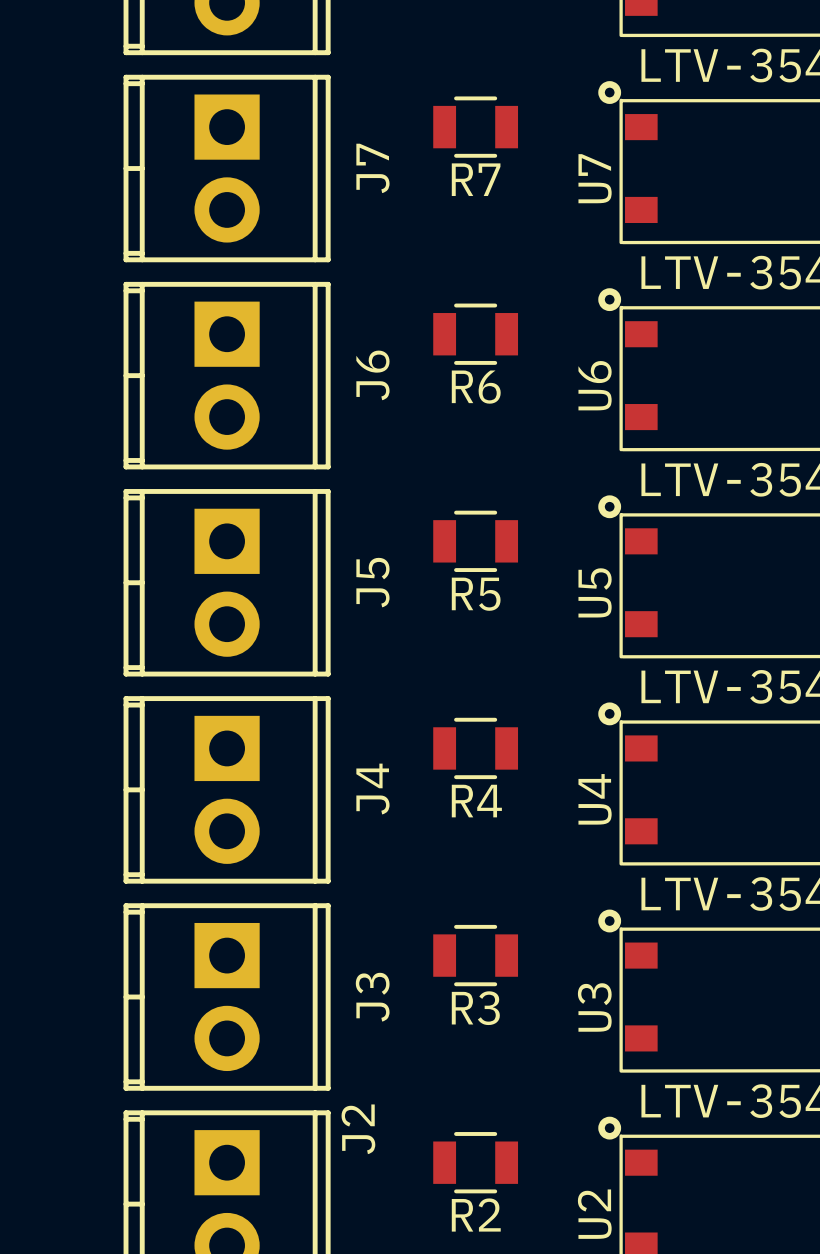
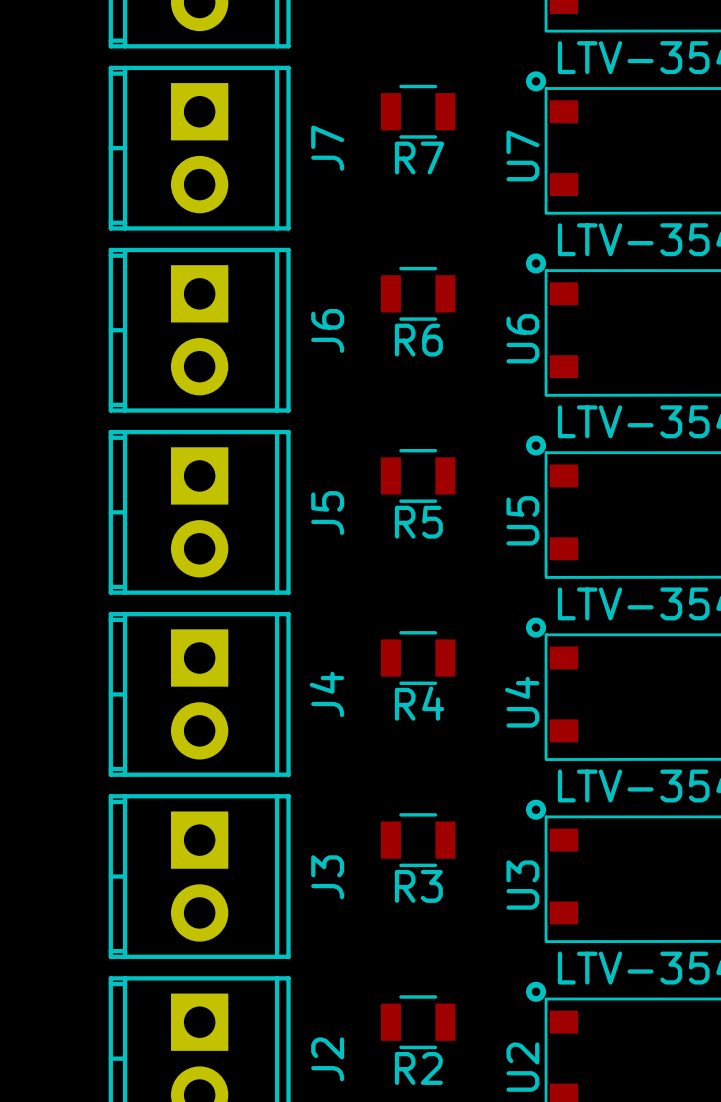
J2 name position: J2 (358, 1129) -> J2 (327, 1059)

